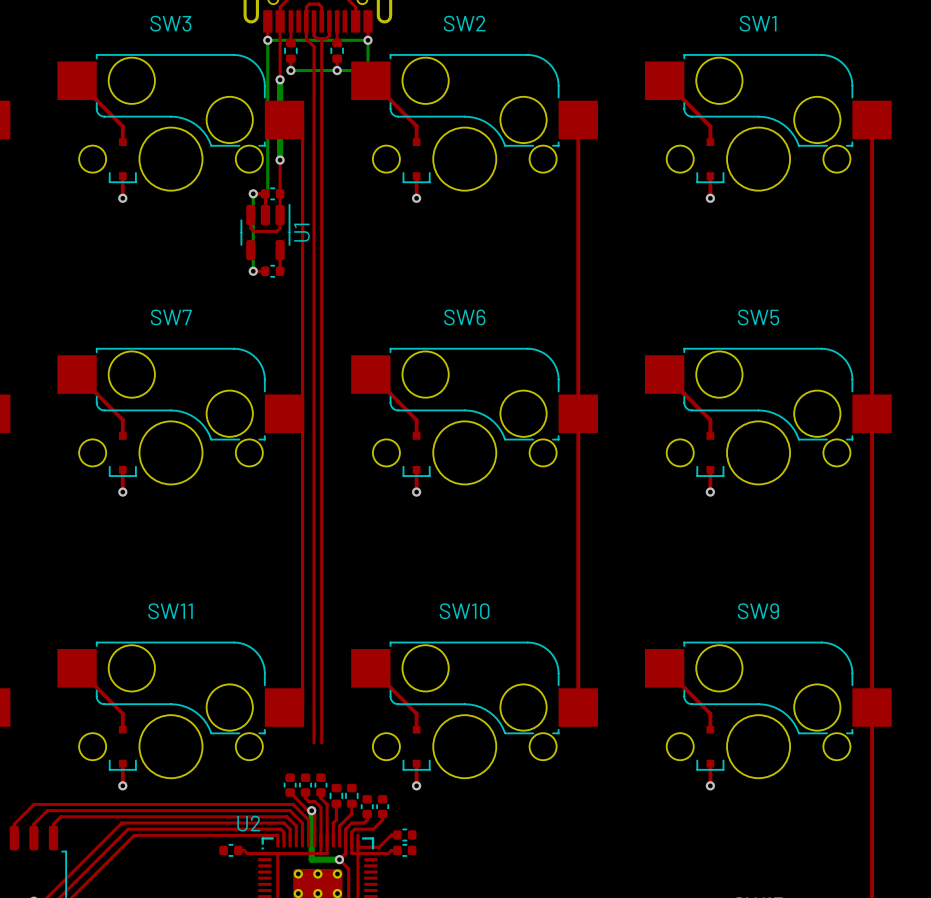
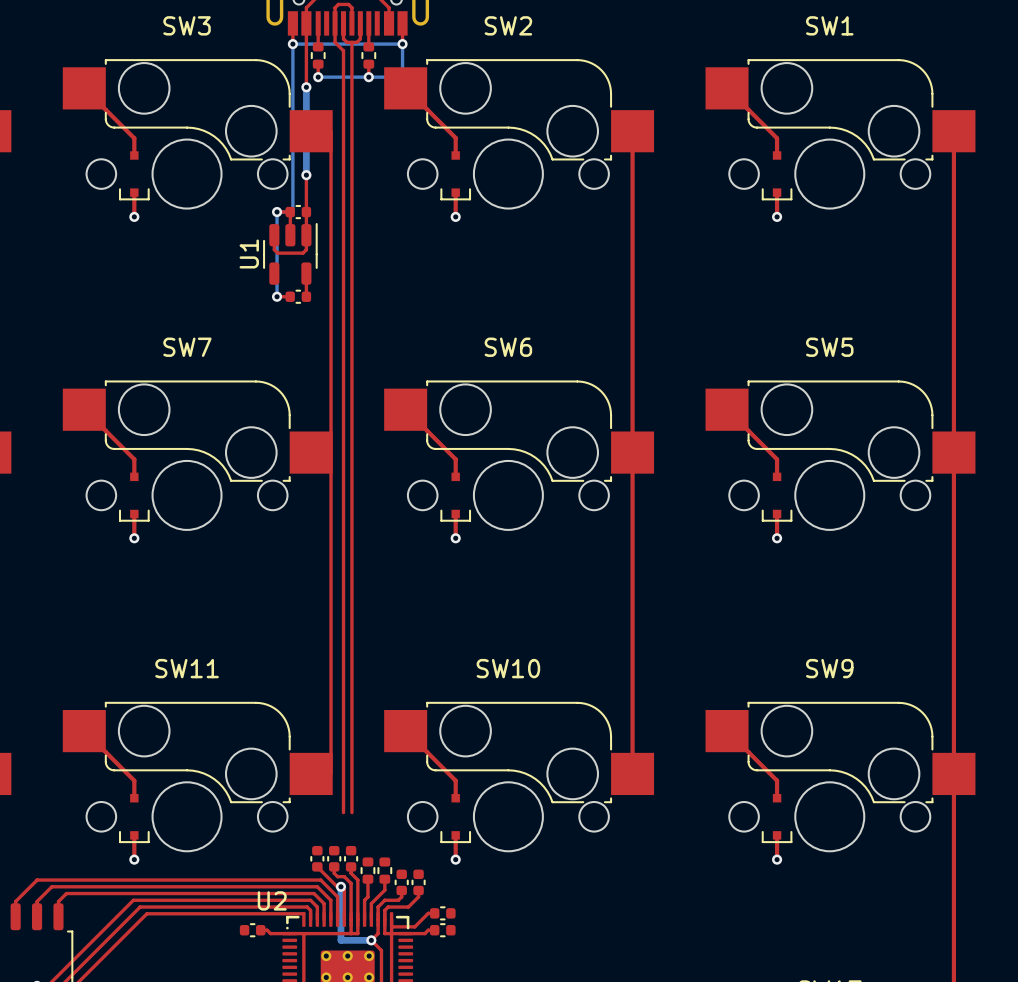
U1 name position: U1 (301, 232) -> U1 (249, 253)

